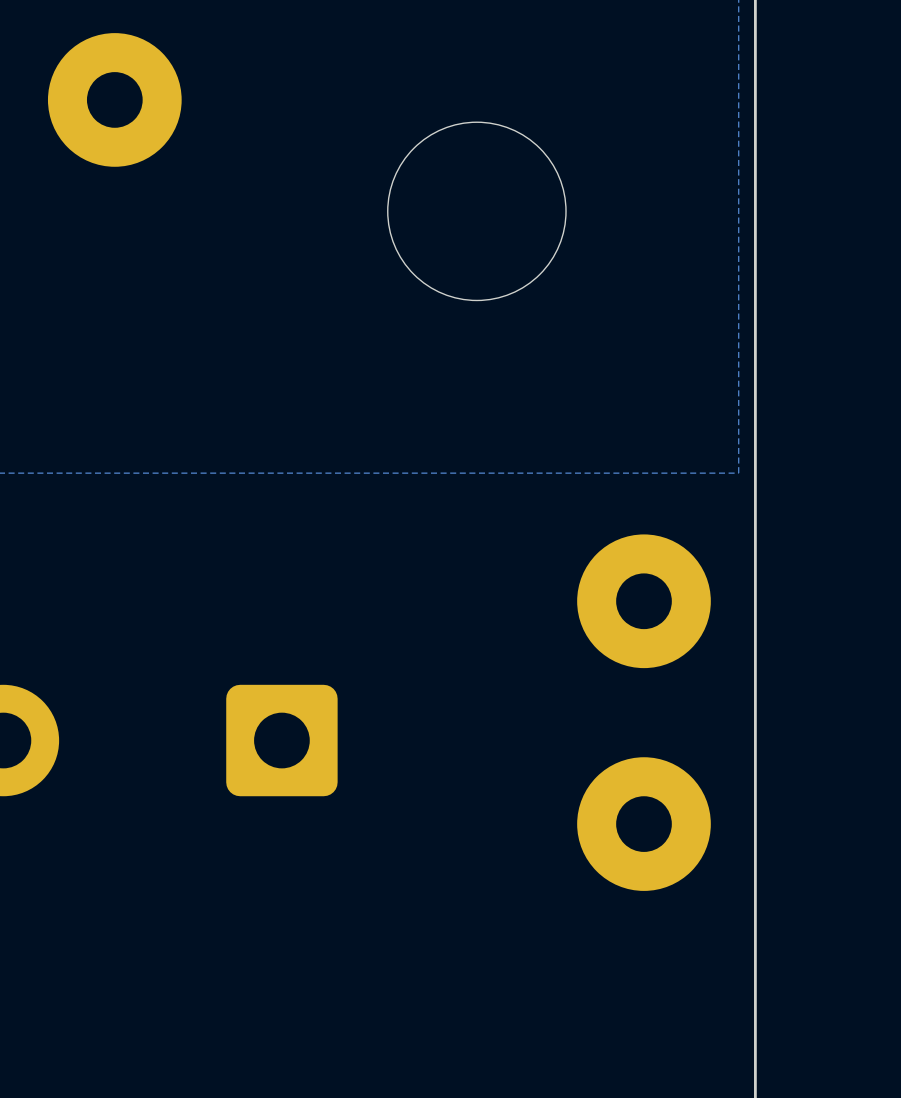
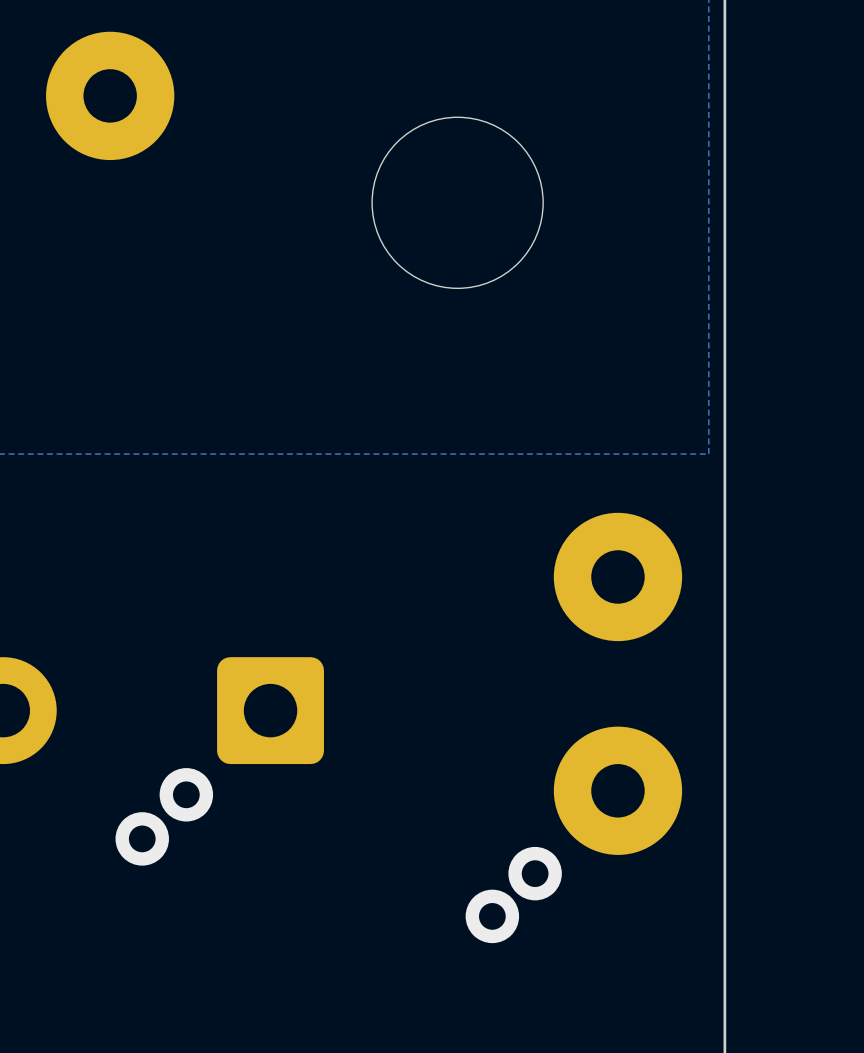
via: none -> (186, 794)
via: none -> (142, 838)
via: none -> (535, 873)
via: none -> (492, 916)

